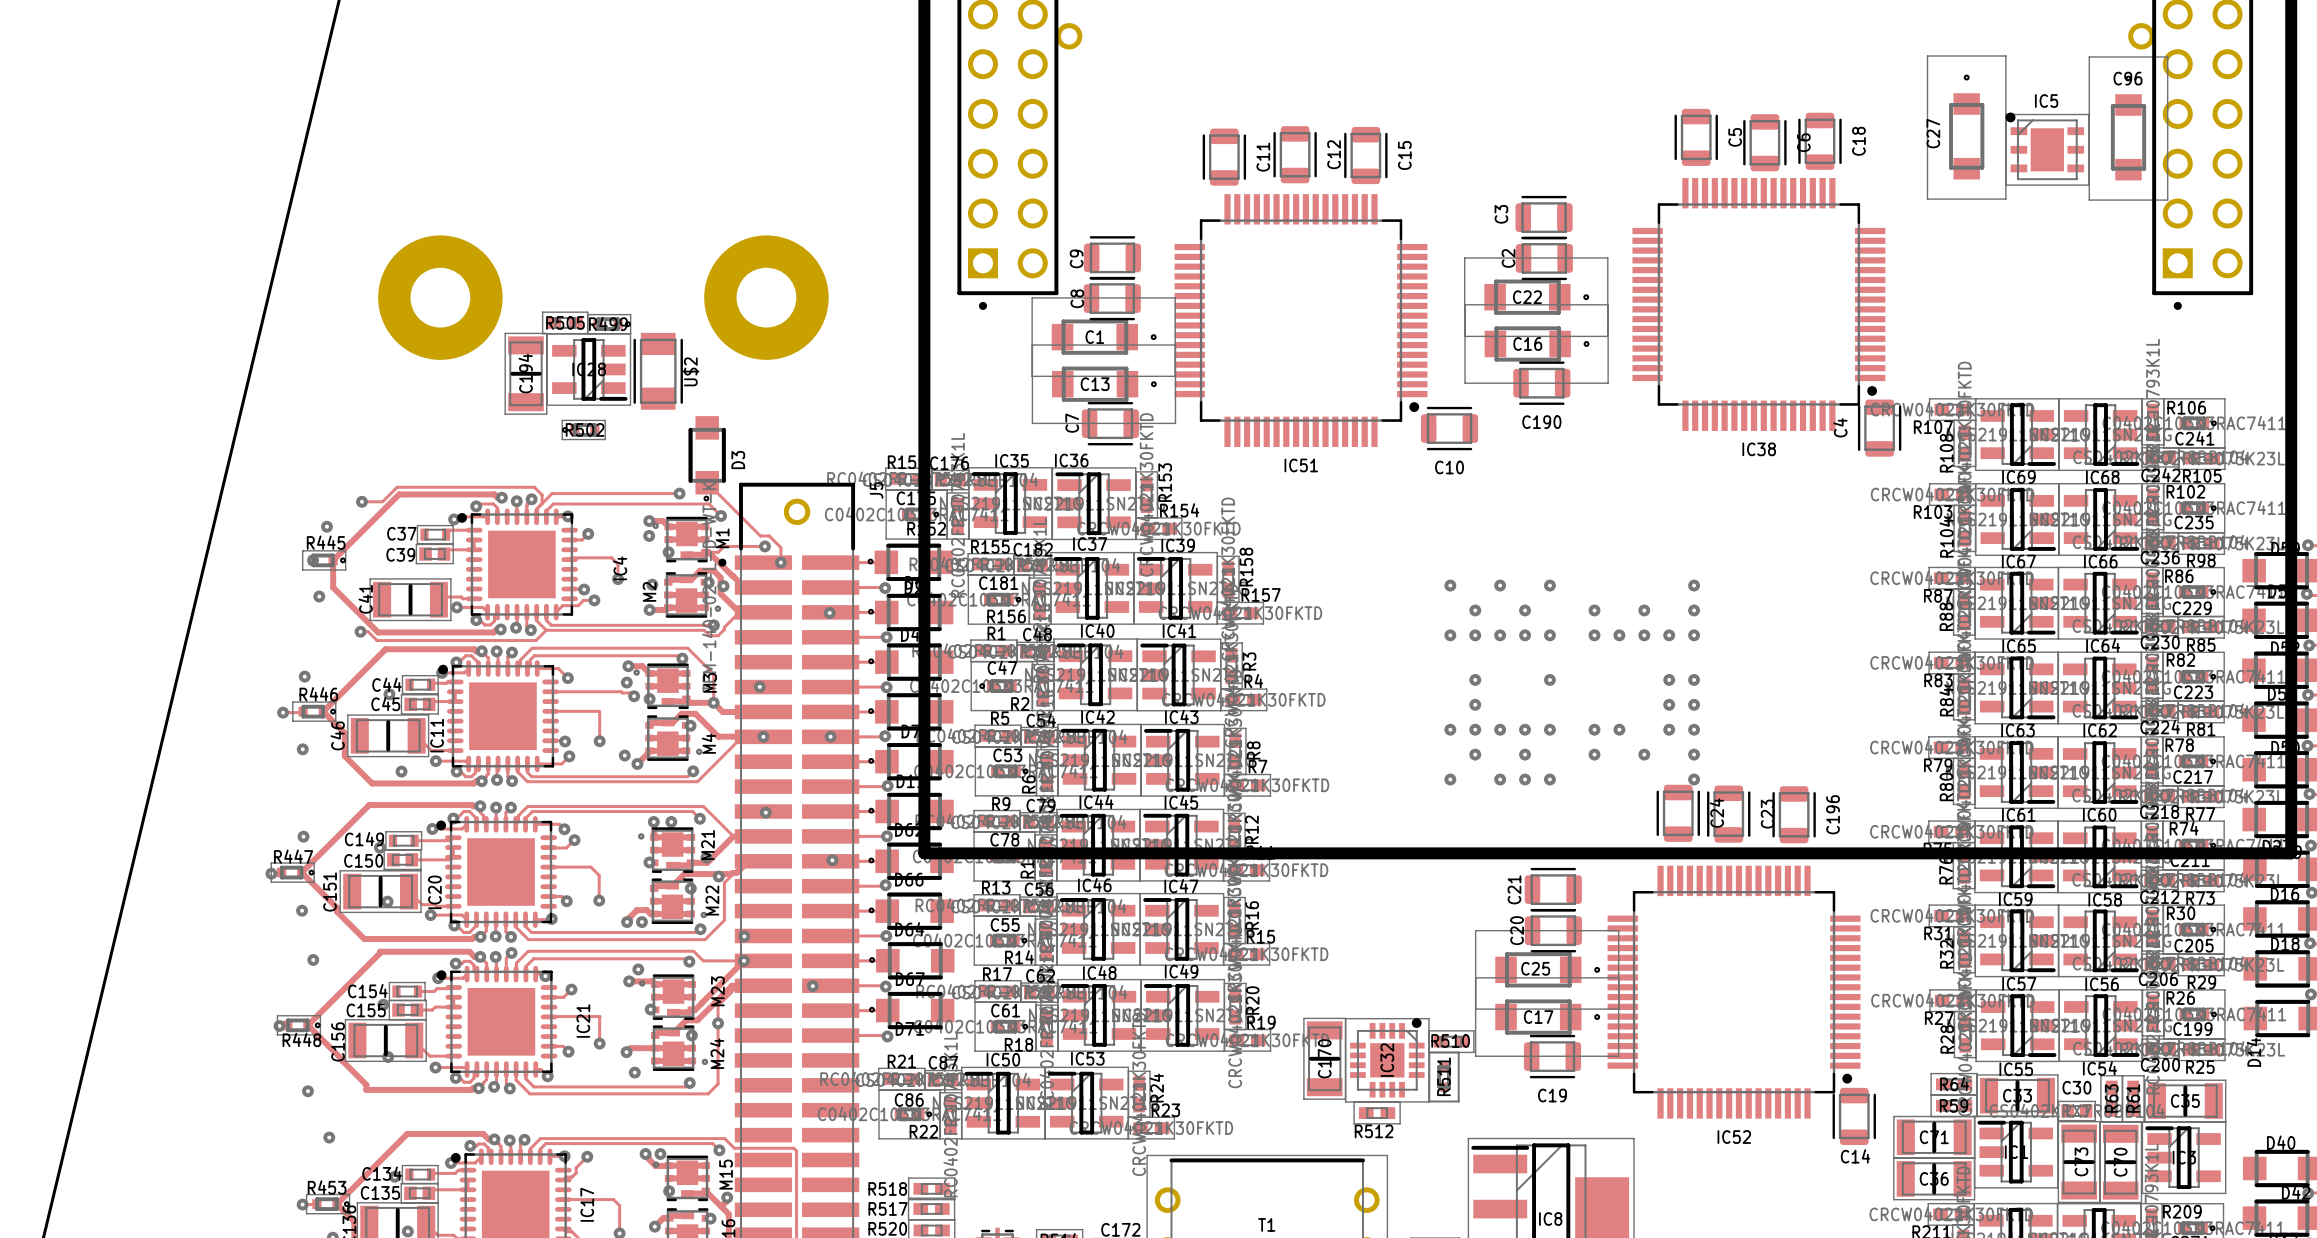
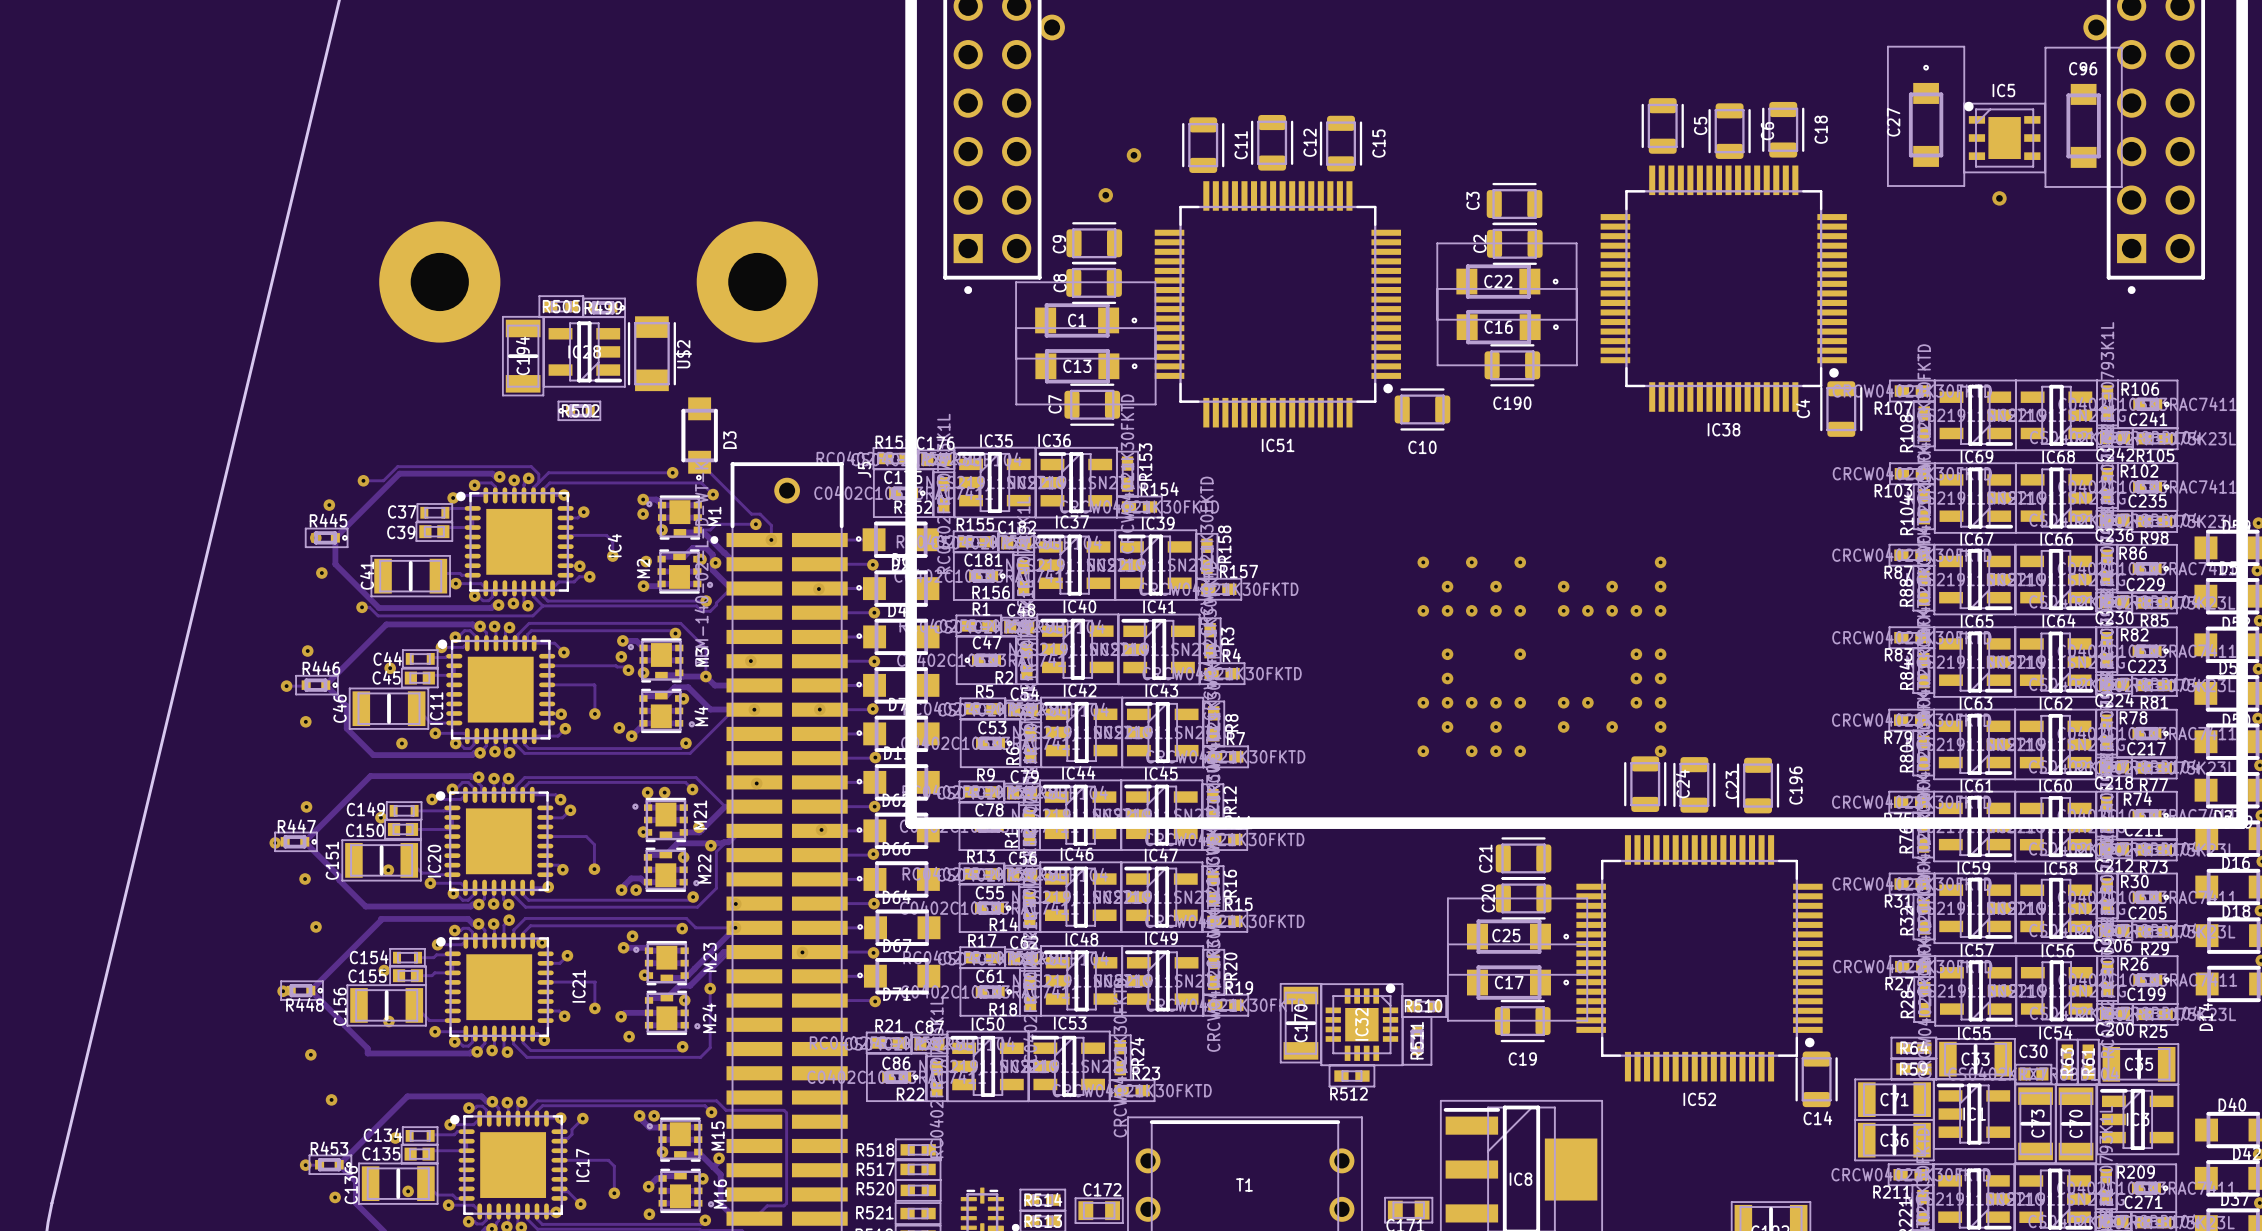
via: none -> (1133, 155)
via: none -> (1105, 195)
via: none -> (1999, 198)

